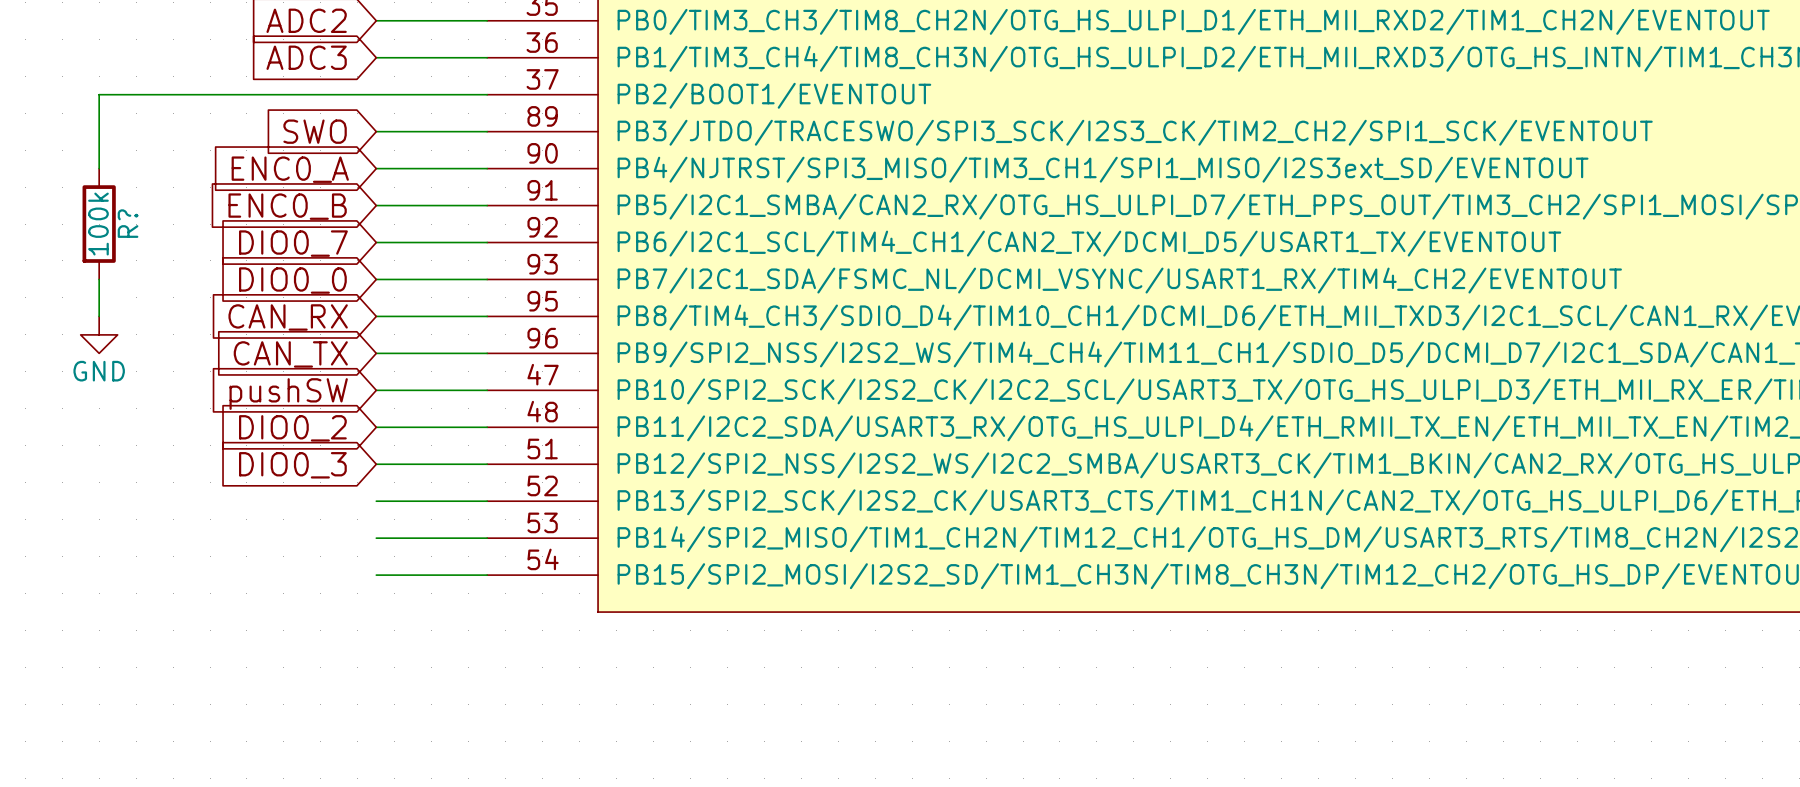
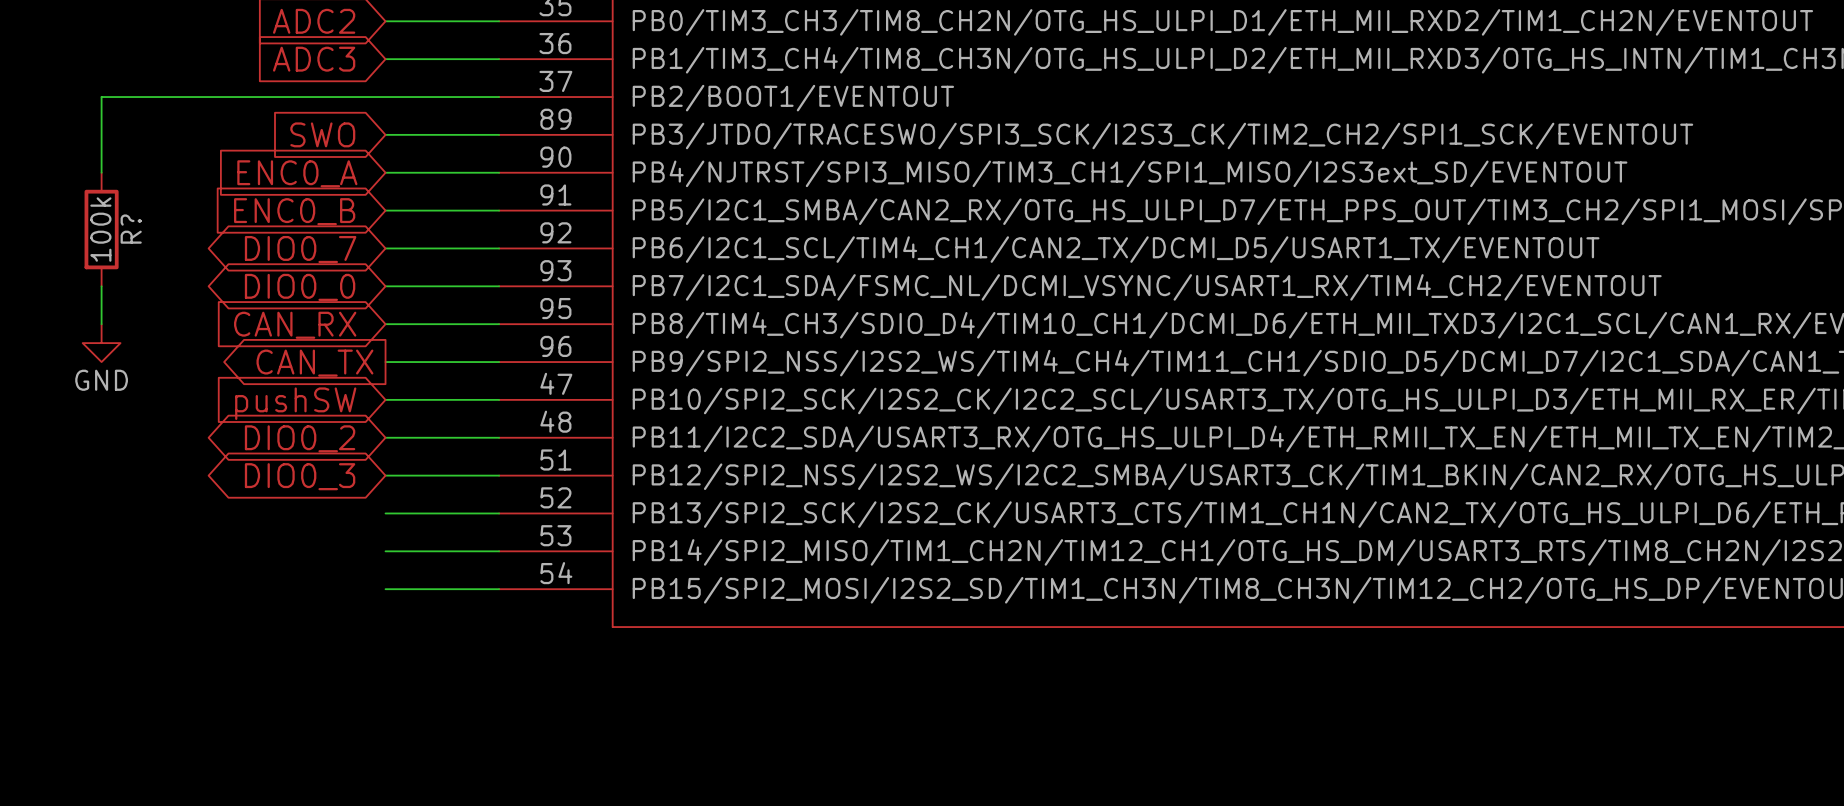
global label shape: input (293, 243) -> bidirectional (300, 249)
global label shape: input (292, 280) -> bidirectional (300, 287)
global label shape: input (290, 354) -> output (314, 363)
global label shape: input (292, 428) -> bidirectional (300, 438)
global label shape: input (292, 465) -> bidirectional (300, 476)

